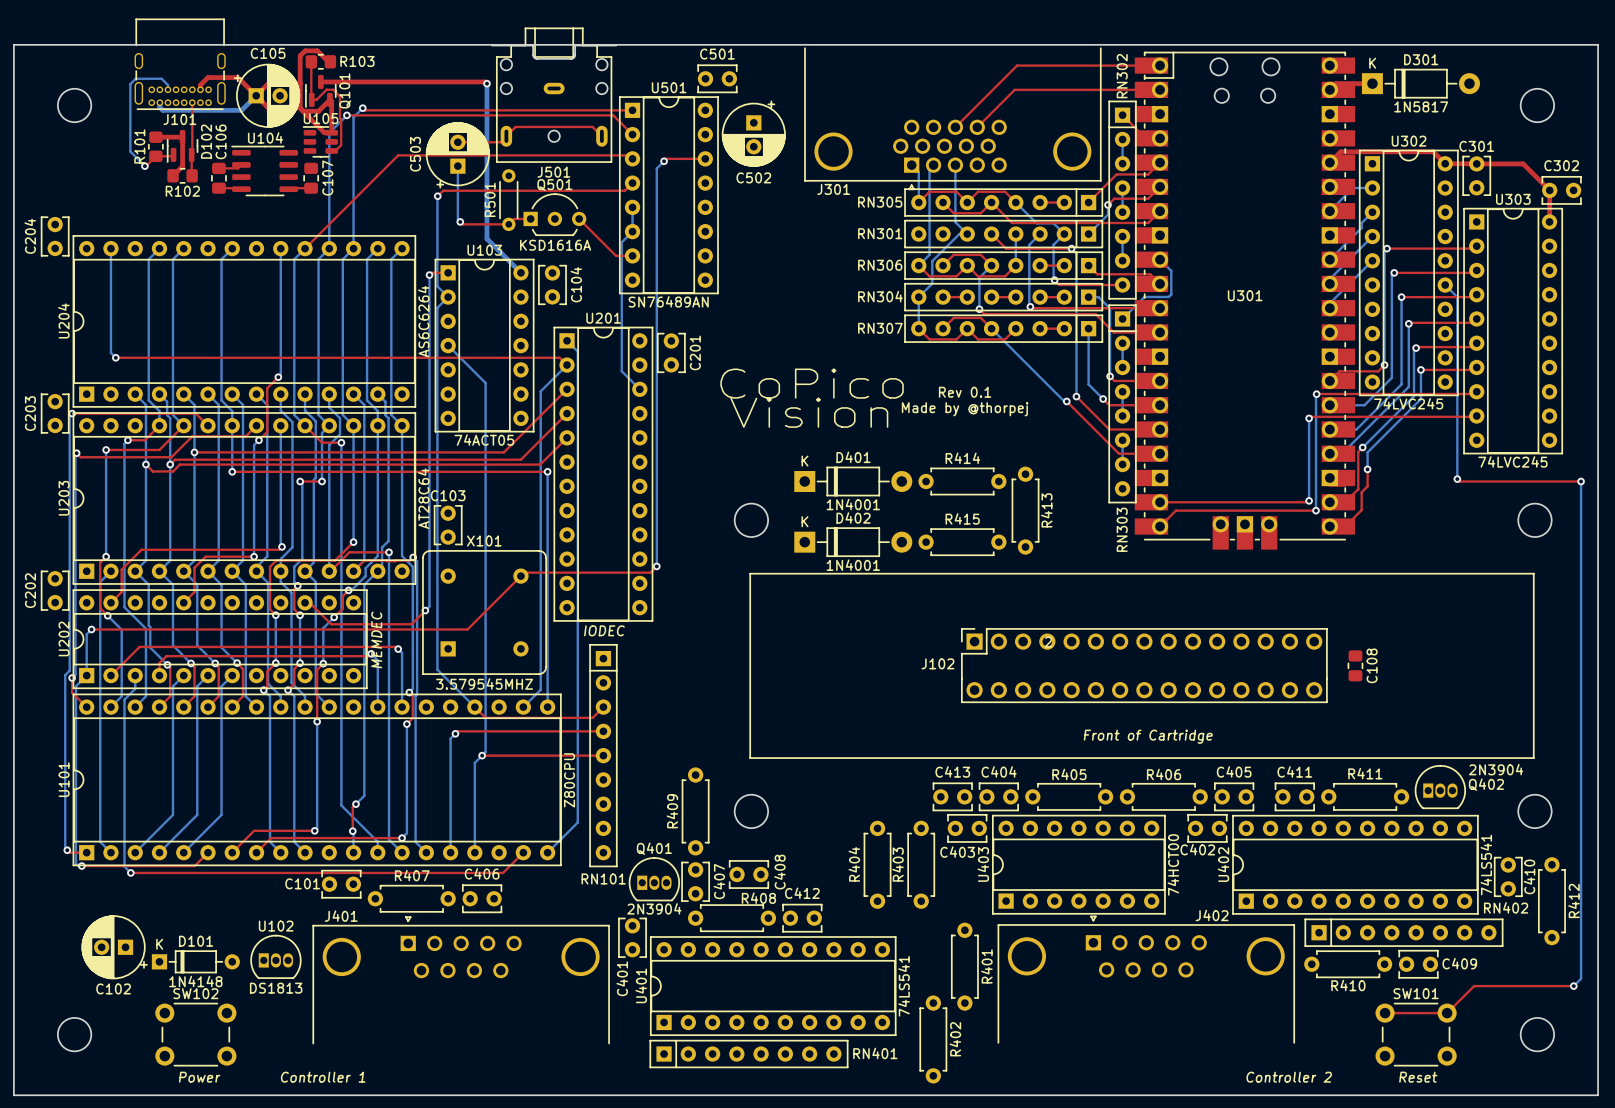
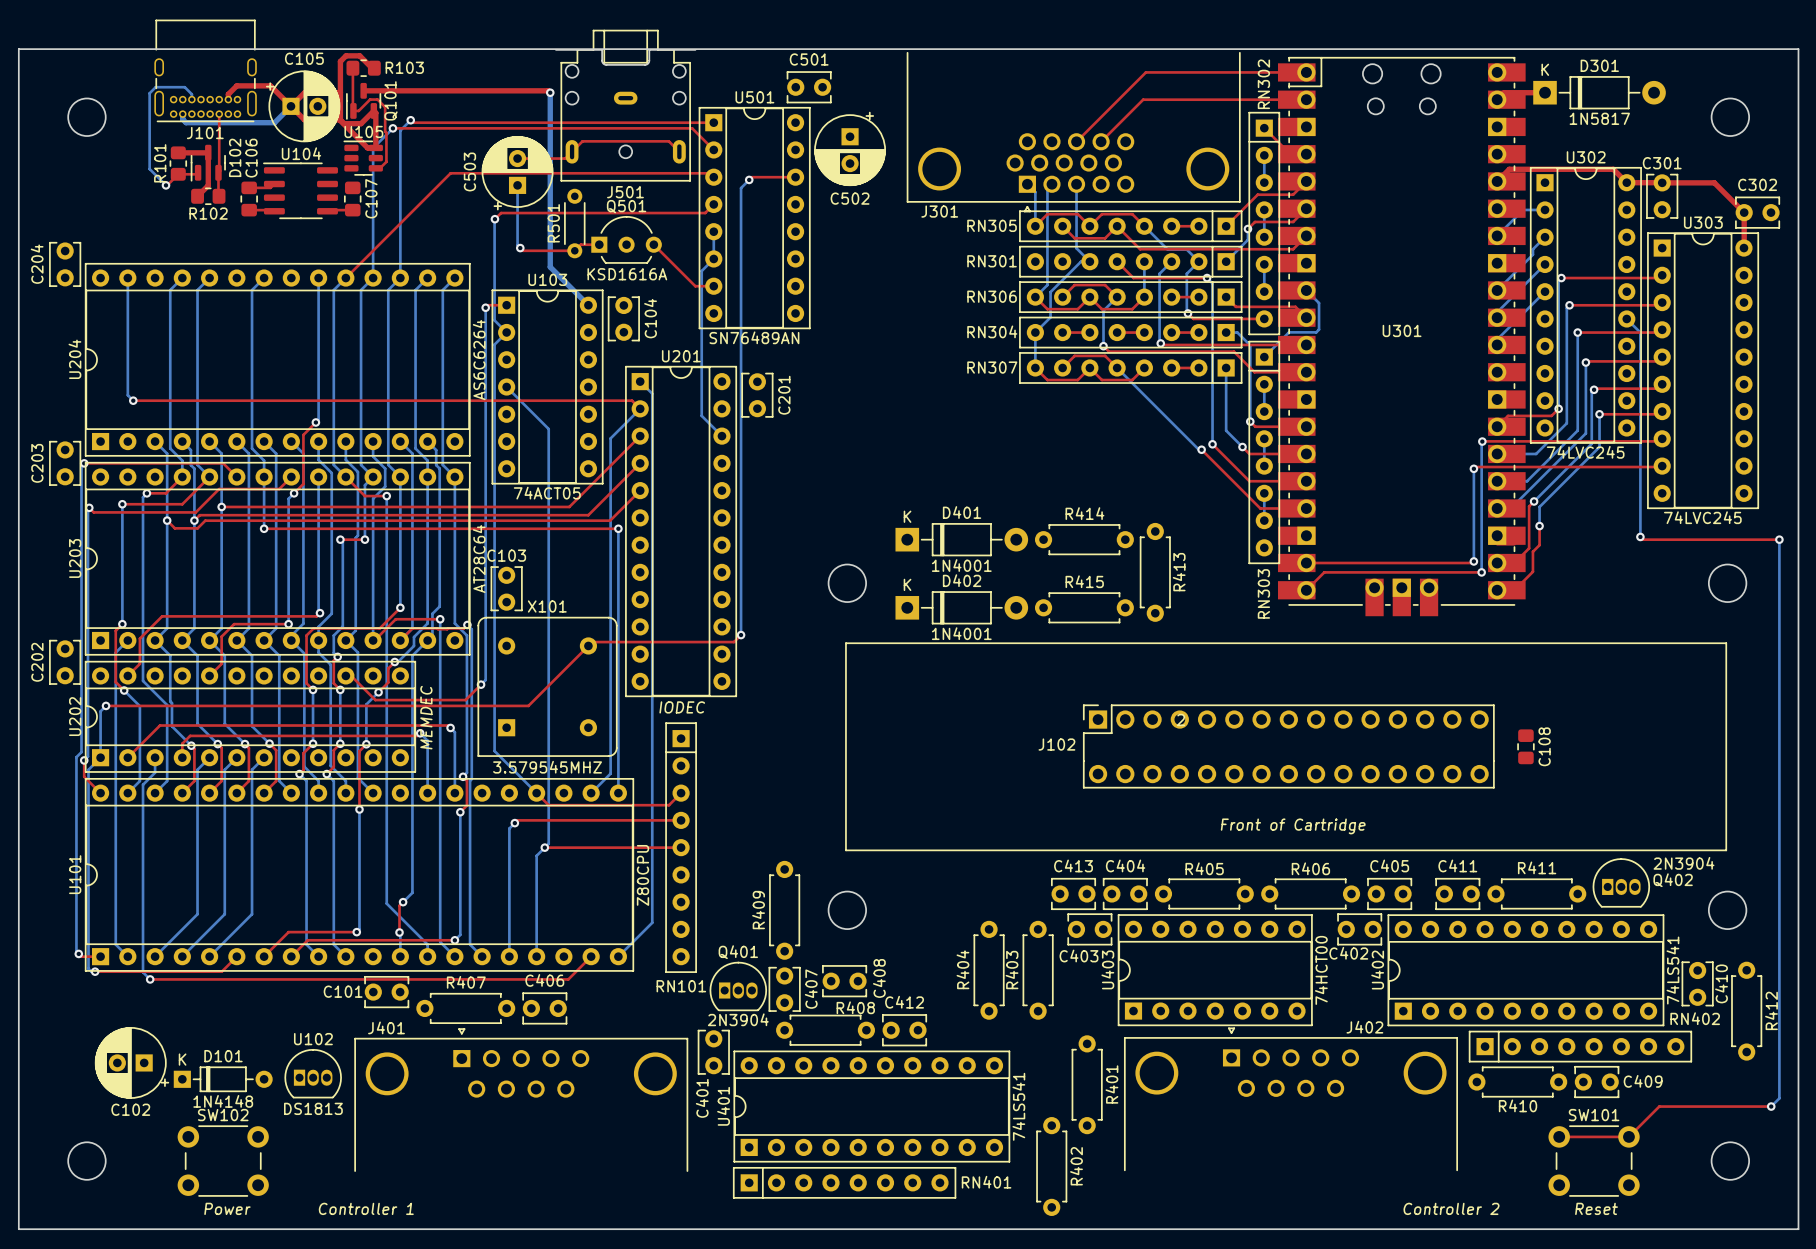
text: CoPico (812, 383) -> none
text: Rev 0.1 (965, 392) -> none
text: Made by @thorpej (965, 409) -> none
text: Vision (809, 412) -> none

